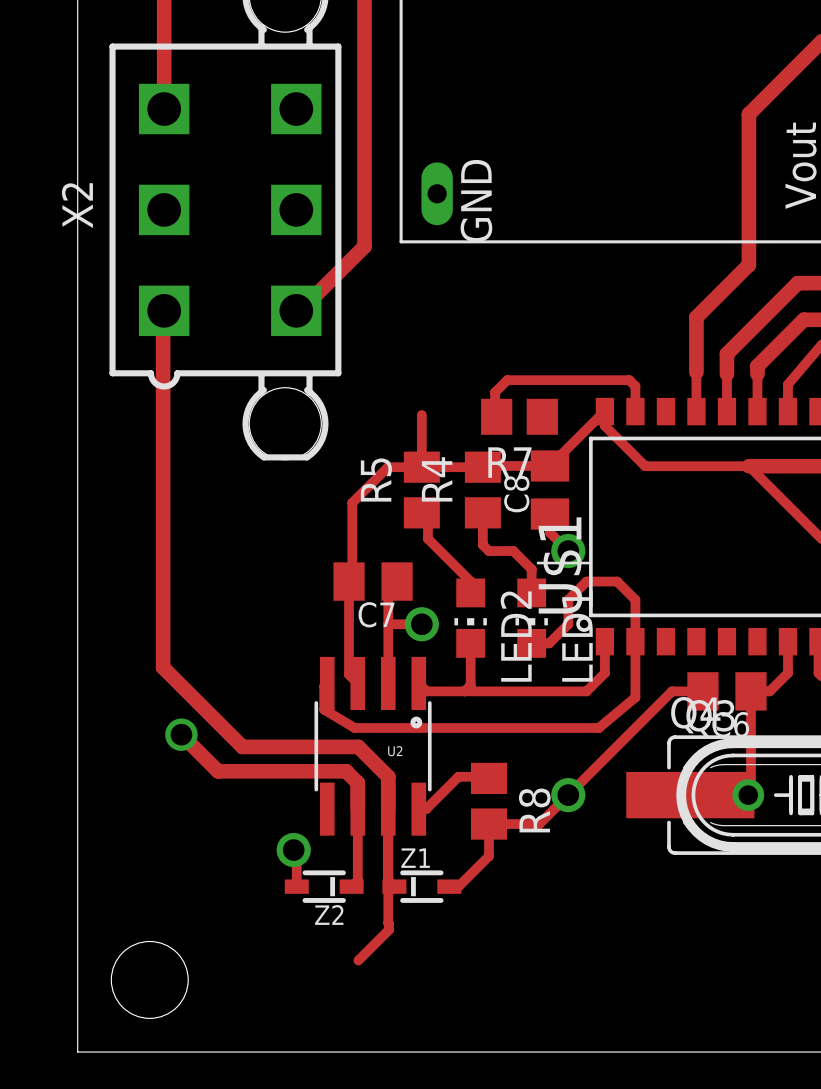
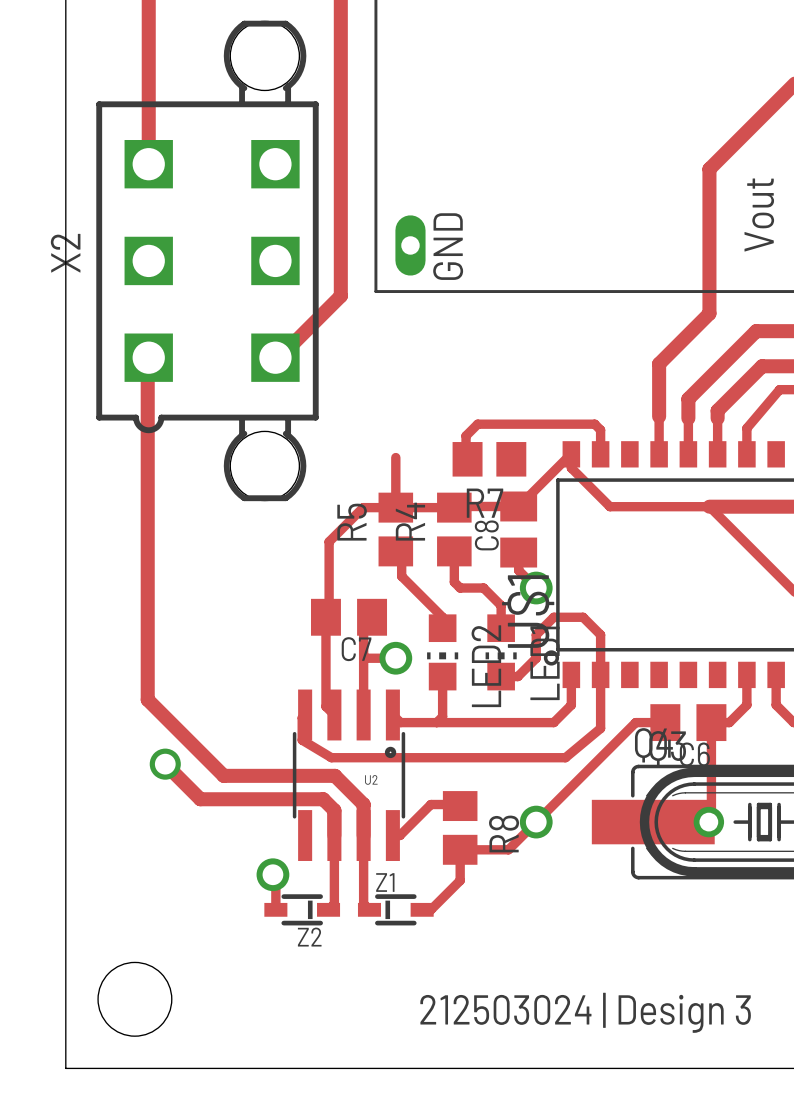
track: (388, 880) (388, 929) (358, 960) -> none
text: none -> 212503024 | Design 3 (585, 1012)

